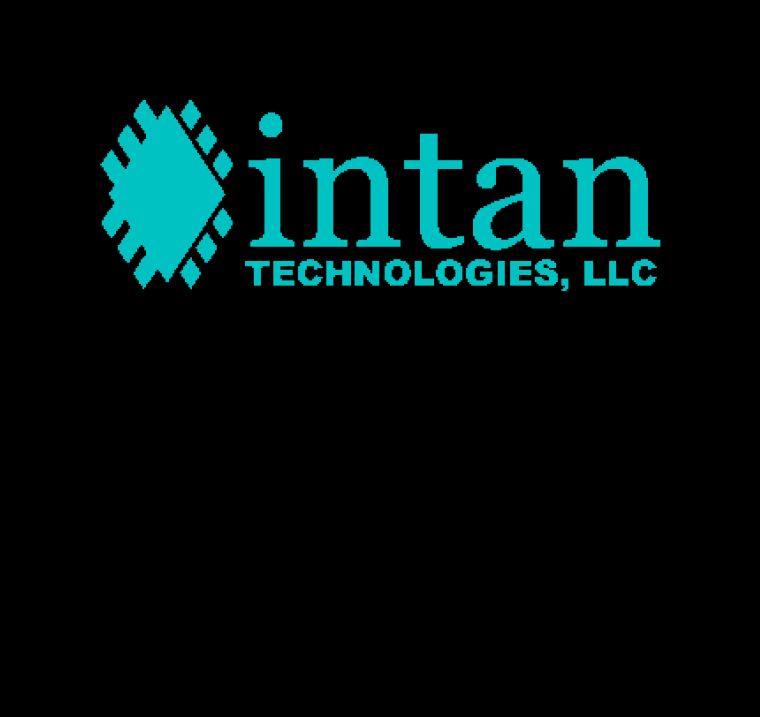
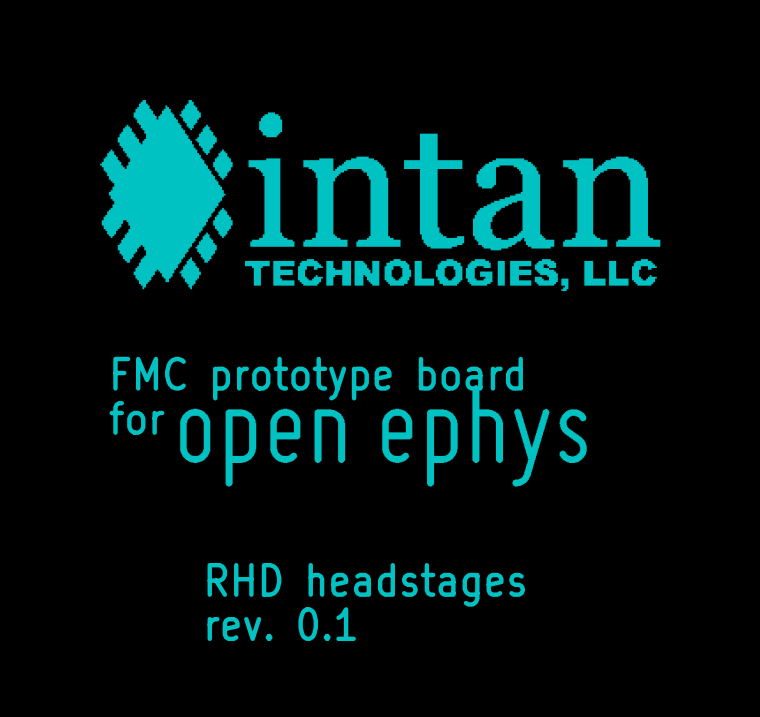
text: none -> FMC prototype board (318, 378)
drawing: none -> [180, 385, 587, 487]
text: none -> for (136, 417)
text: none -> RHD headstages (366, 584)
text: none -> rev. 0.1 (281, 624)

